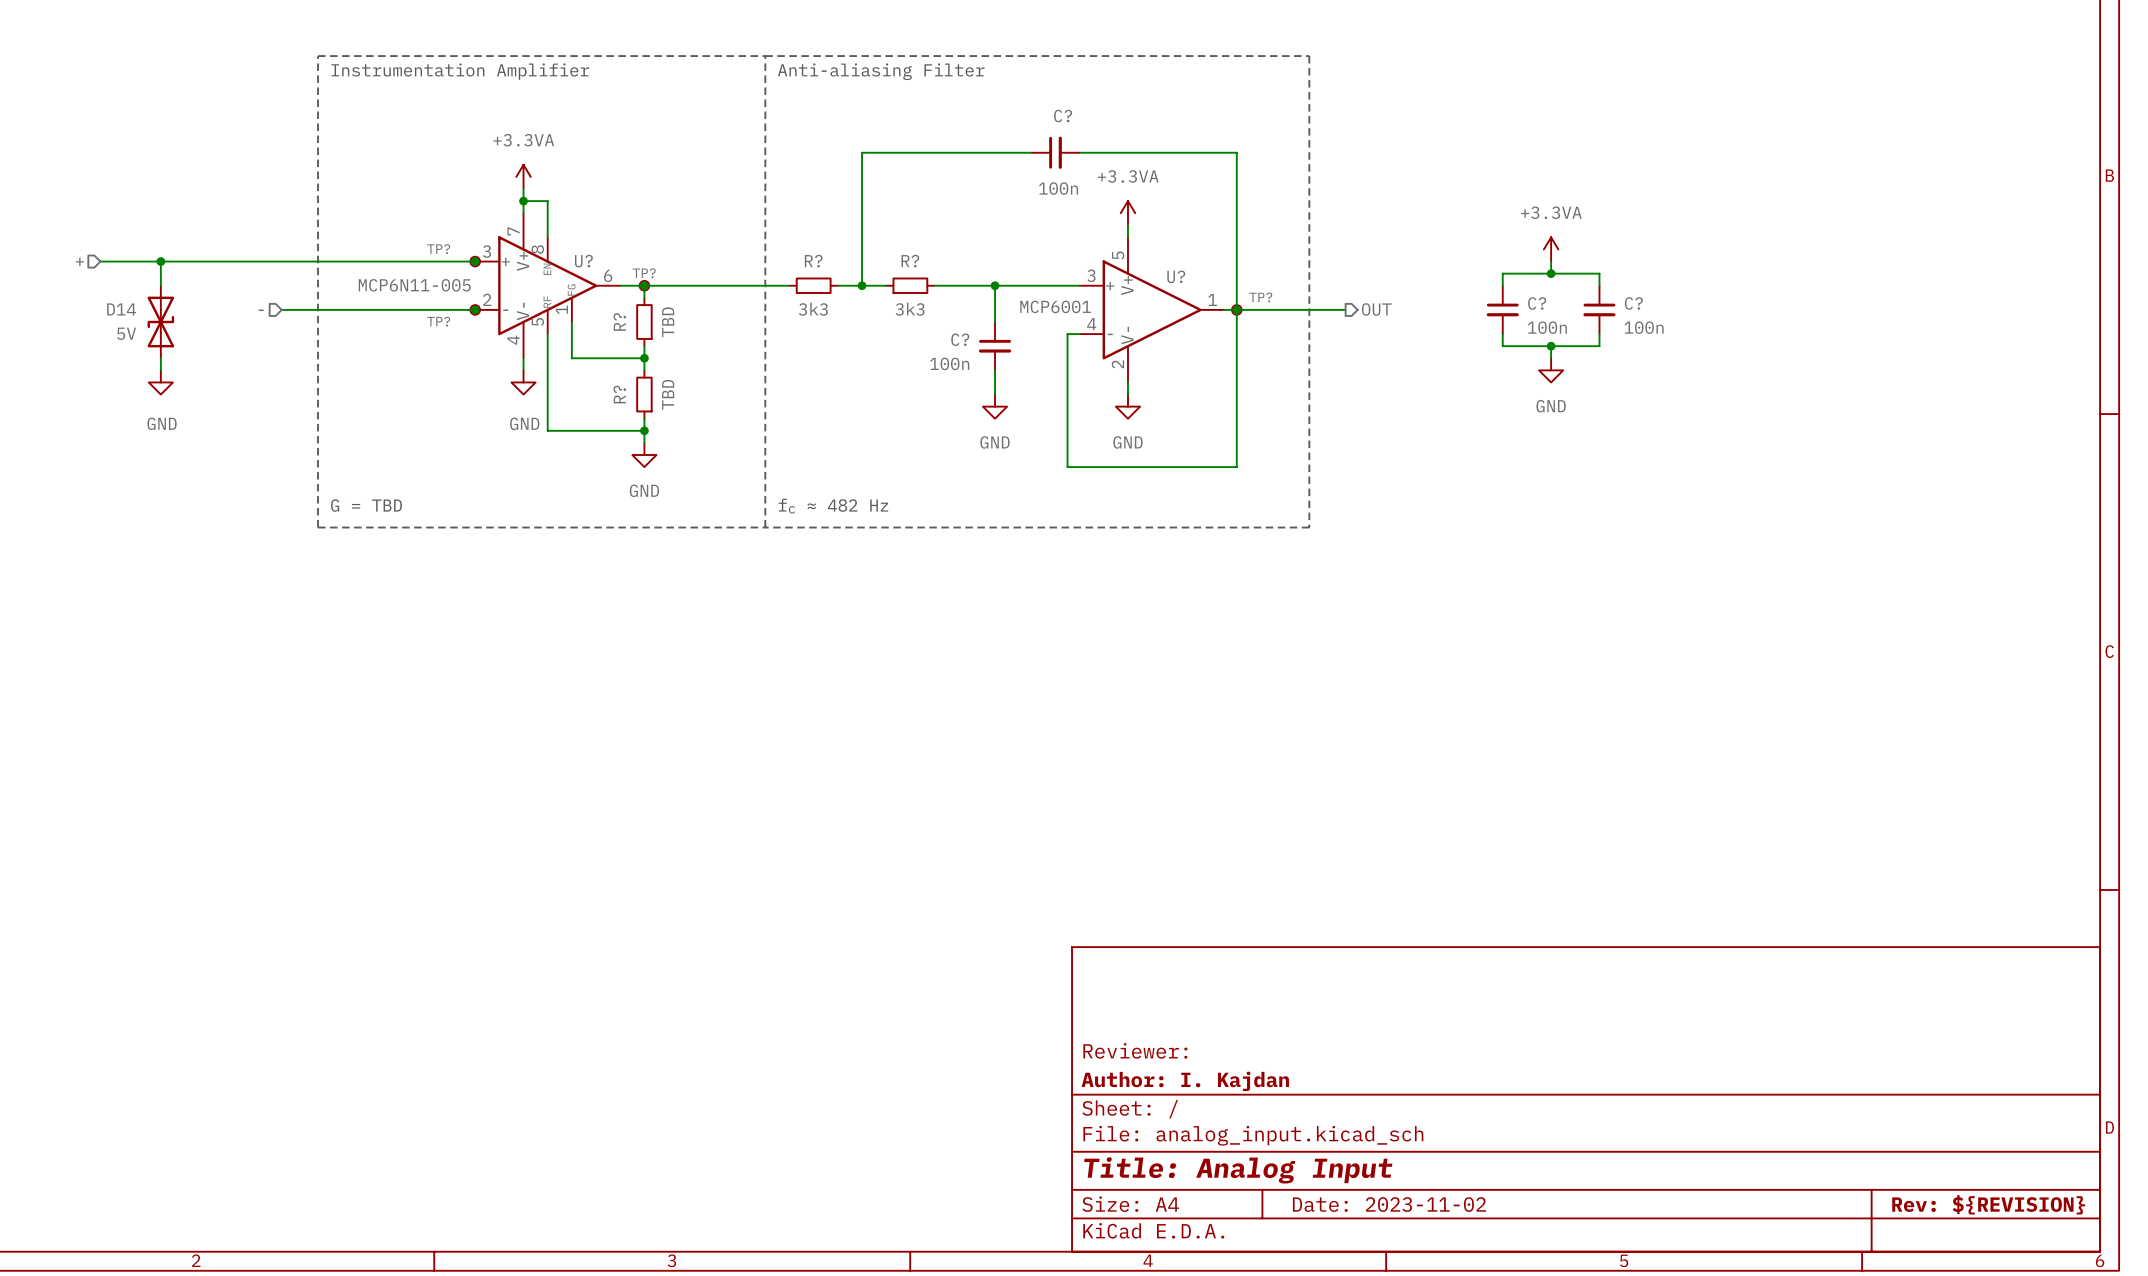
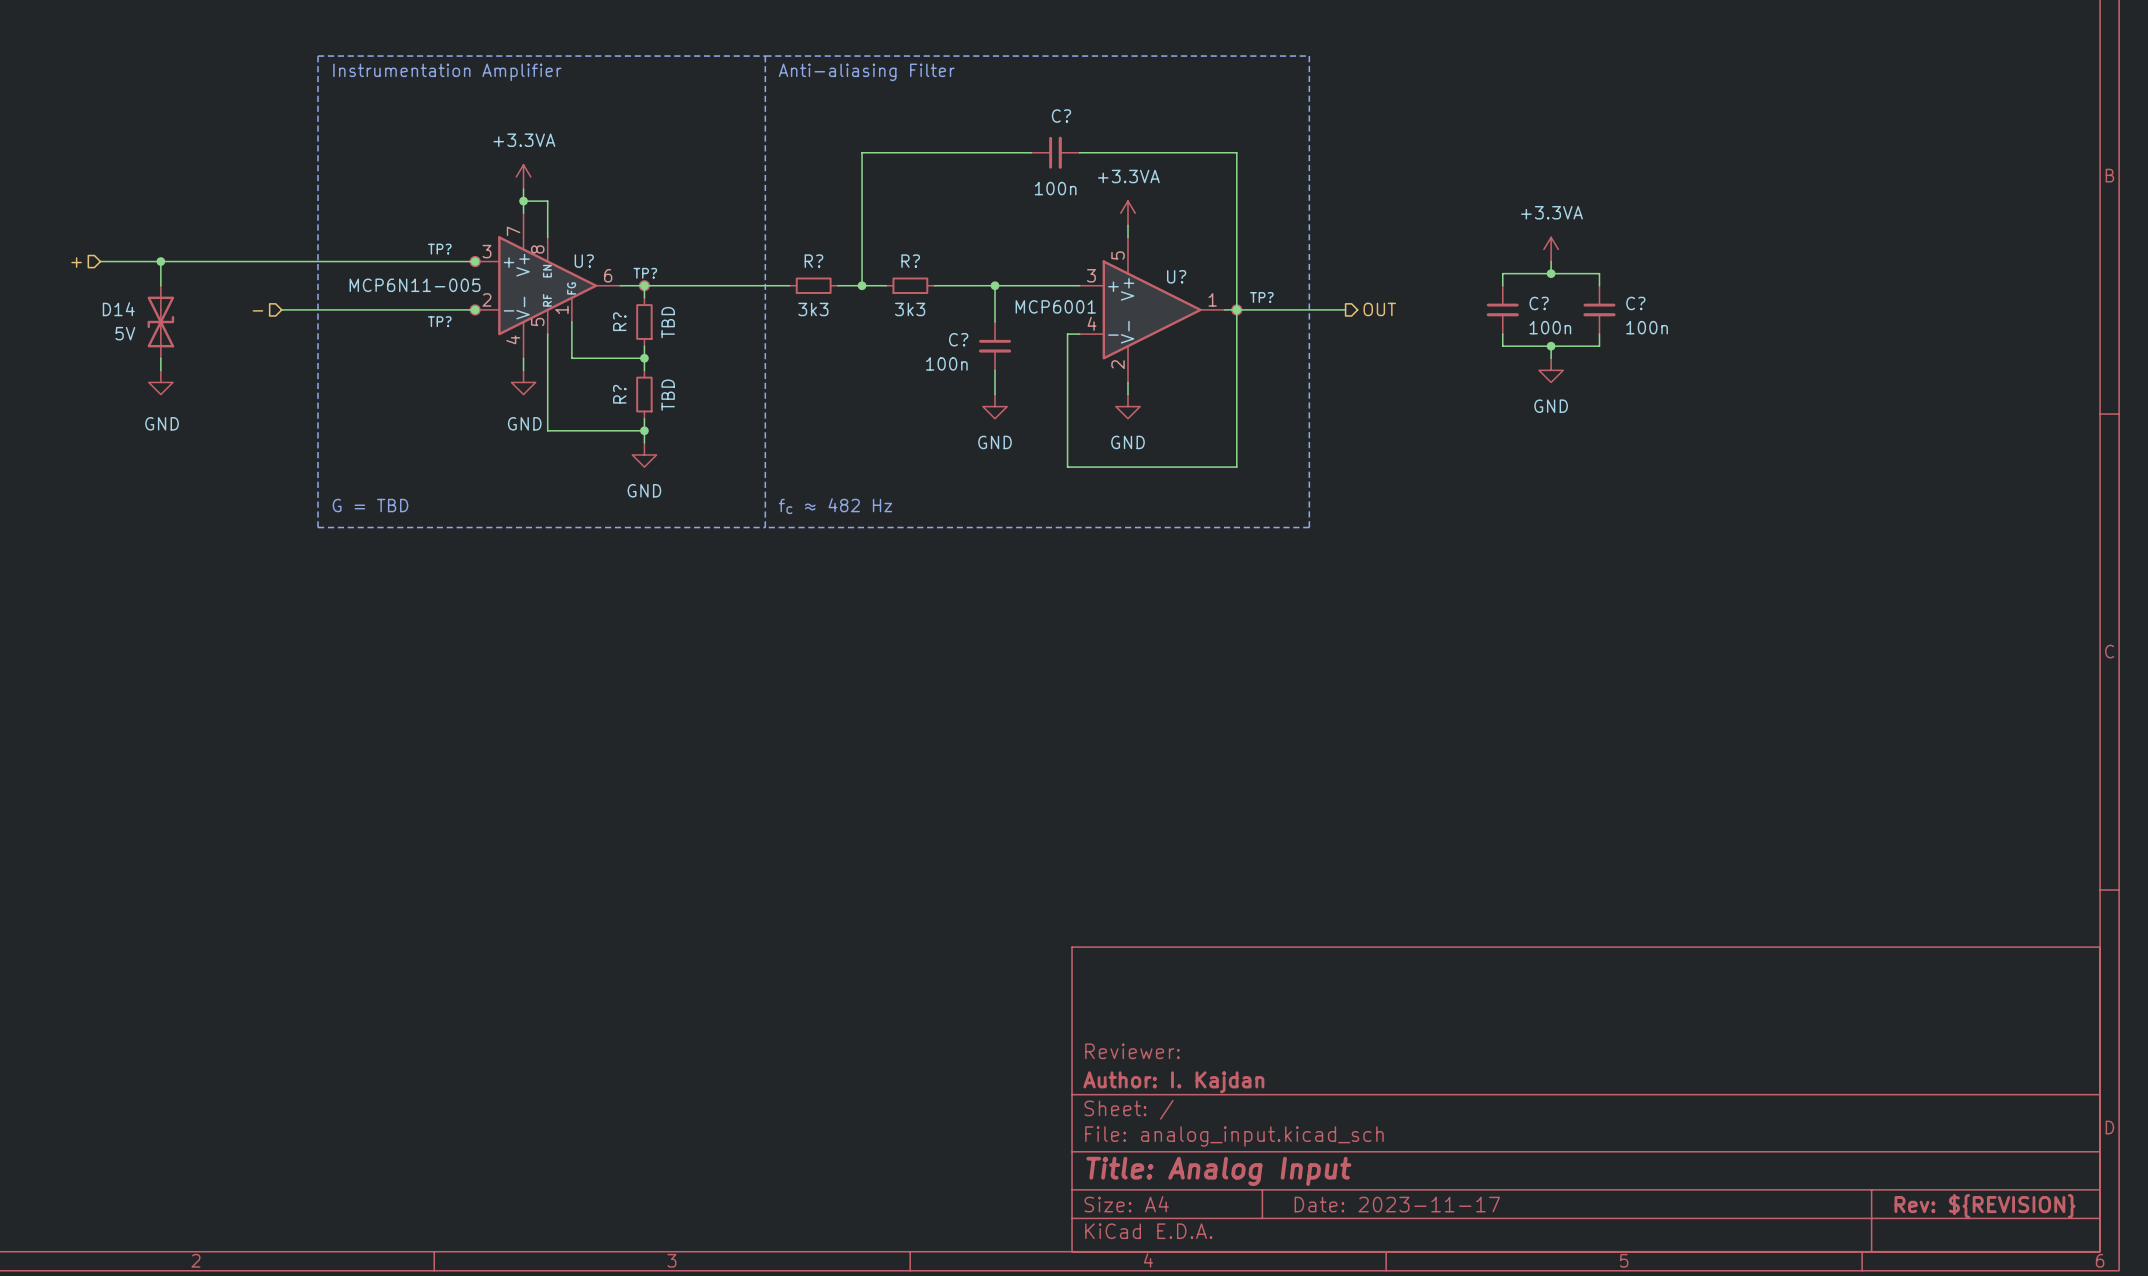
title block: Date: 2023-11-02 (1389, 1204) -> Date: 2023-11-17 (1397, 1204)

